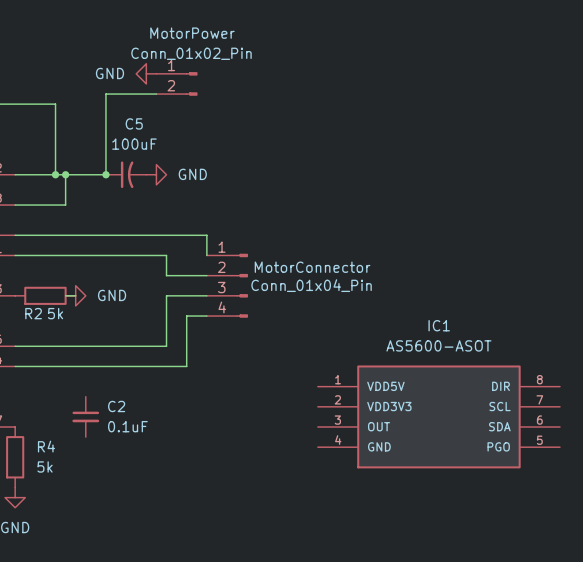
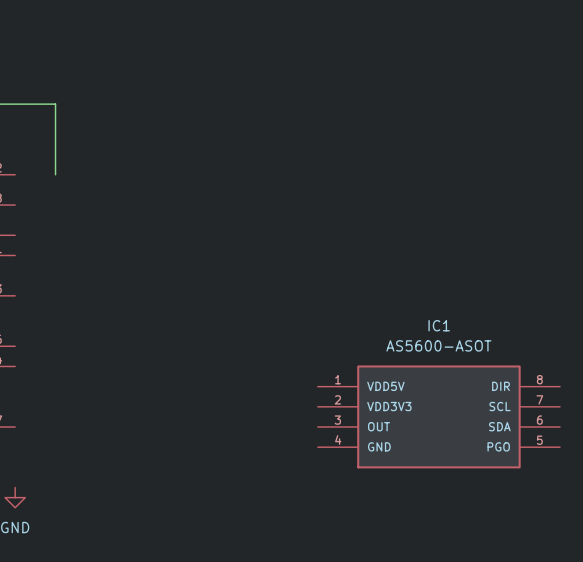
power symbol: GND (146, 73) -> none
MotorPower: Conn_01x02_Pin (176, 83) -> none
wire: (156, 94) (105, 94) (105, 174) (15, 174) -> none
junction: (55, 174) -> none
wire: (65, 174) (65, 205) (15, 205) -> none
junction: (65, 174) -> none
junction: (105, 174) -> none
C5: 100uF (126, 174) -> none
power symbol: GND (156, 174) -> none
wire: (15, 235) (206, 235) (206, 255) -> none
wire: (15, 255) (166, 255) (166, 275) (206, 275) -> none
MotorConnector: Conn_01x04_Pin (227, 285) -> none
R2: 5k (45, 295) -> none
wire: (65, 295) (75, 295) -> none
power symbol: GND (75, 295) -> none
wire: (206, 295) (166, 295) (166, 346) (15, 346) -> none
wire: (206, 316) (186, 316) (186, 366) (15, 366) -> none
C2: 0.1uF (85, 416) -> none
R4: 5k (15, 457) -> none

